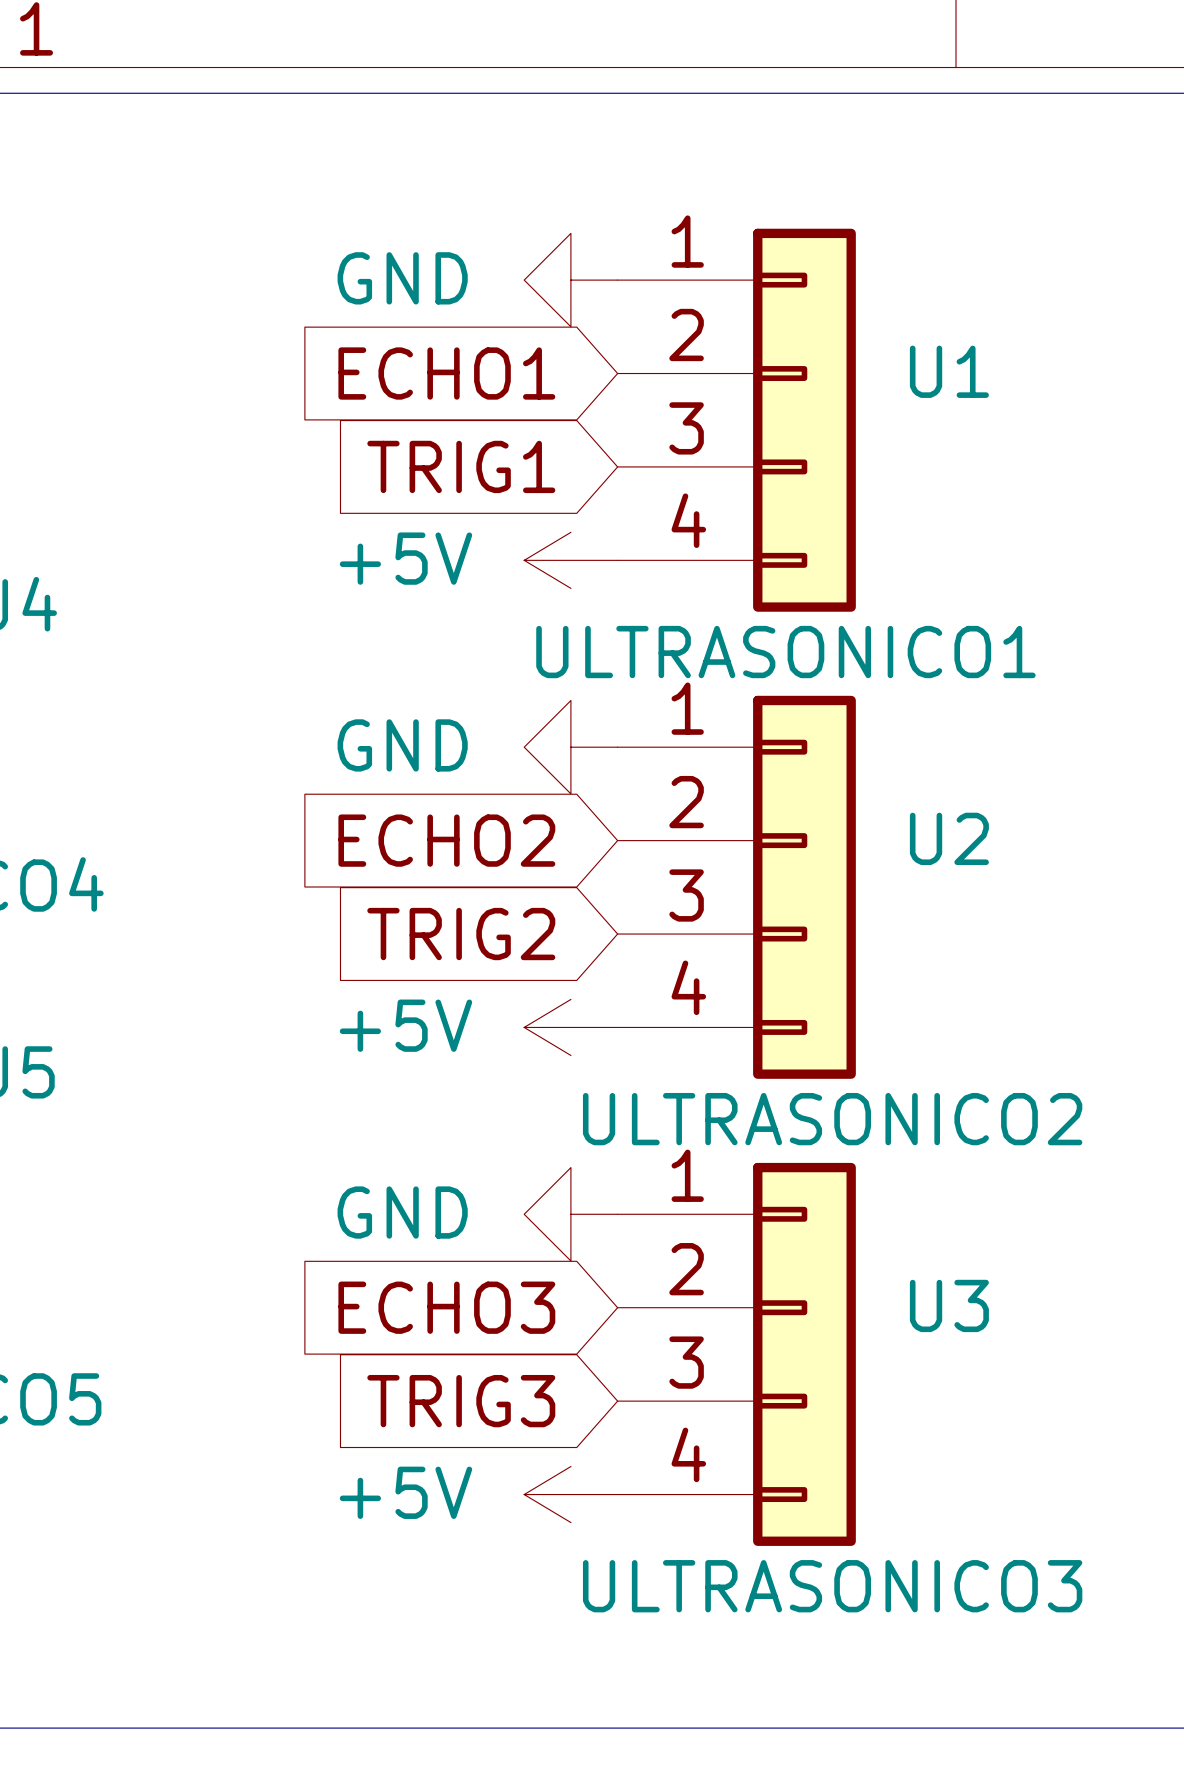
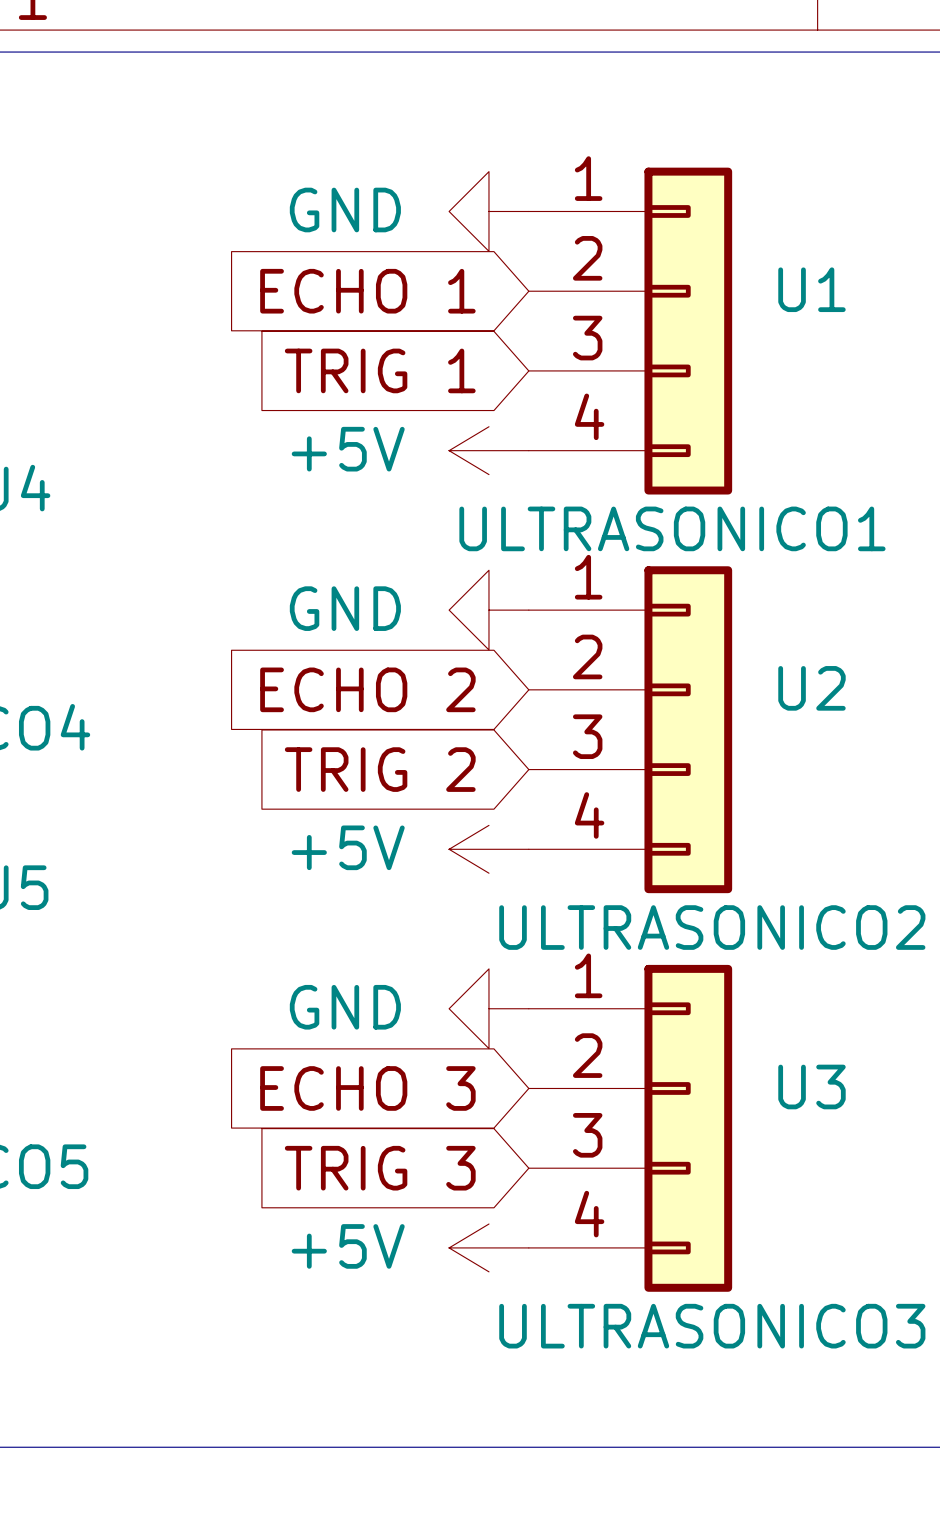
global label: ECHO1 (446, 373) -> ECHO 1 (367, 291)
global label: TRIG1 (461, 466) -> TRIG 1 (380, 370)
global label: ECHO2 (446, 840) -> ECHO 2 (367, 689)
global label: TRIG2 (461, 934) -> TRIG 2 (380, 769)
global label: ECHO3 (446, 1307) -> ECHO 3 (367, 1088)
global label: TRIG3 (461, 1401) -> TRIG 3 (380, 1168)

